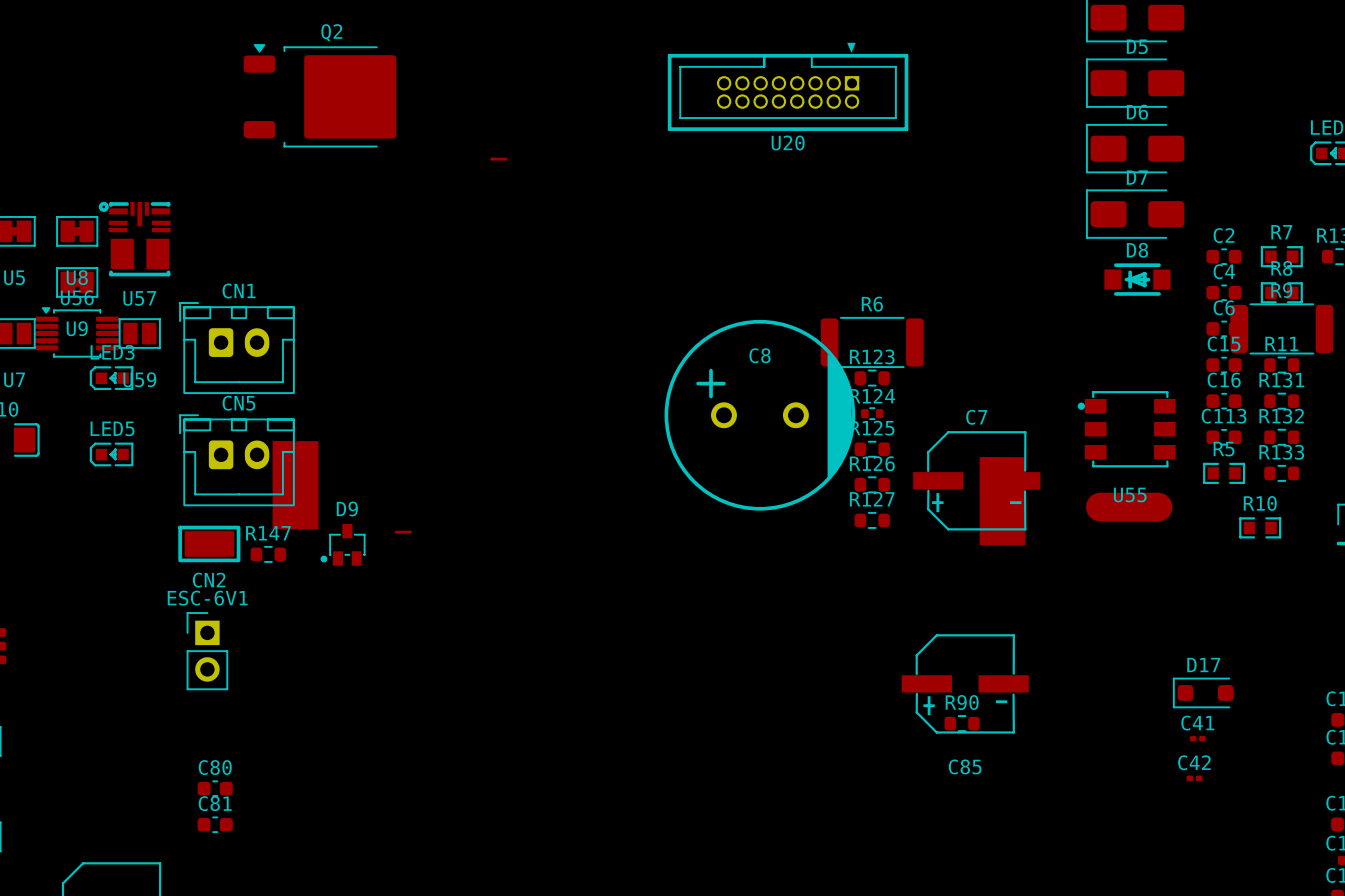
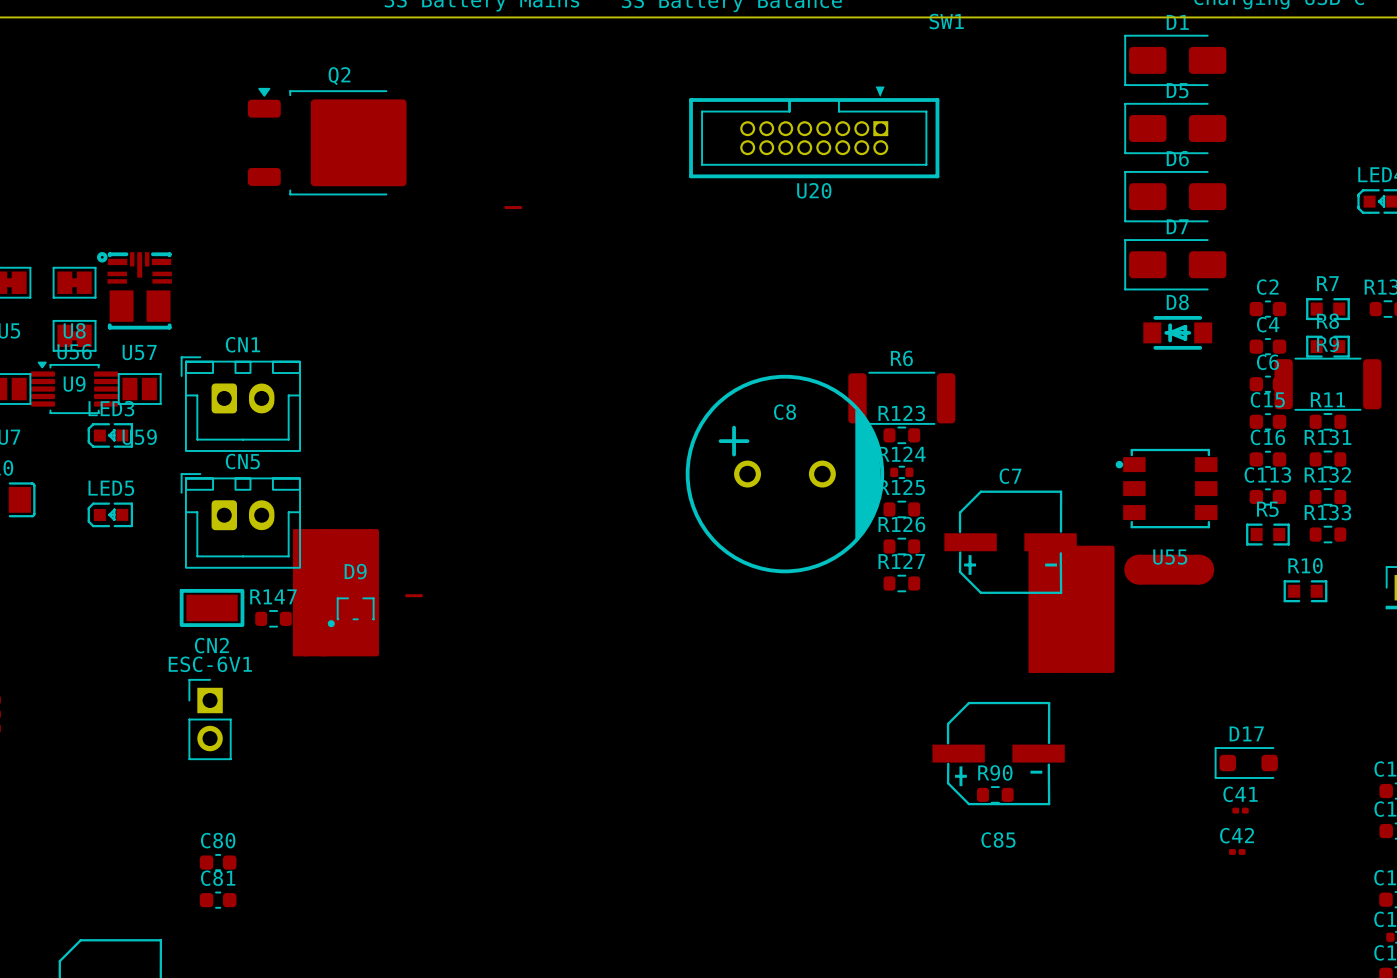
part: (295, 485) -> none
part: (1002, 501) -> none
part: none -> (335, 592)
part: none -> (1071, 609)

